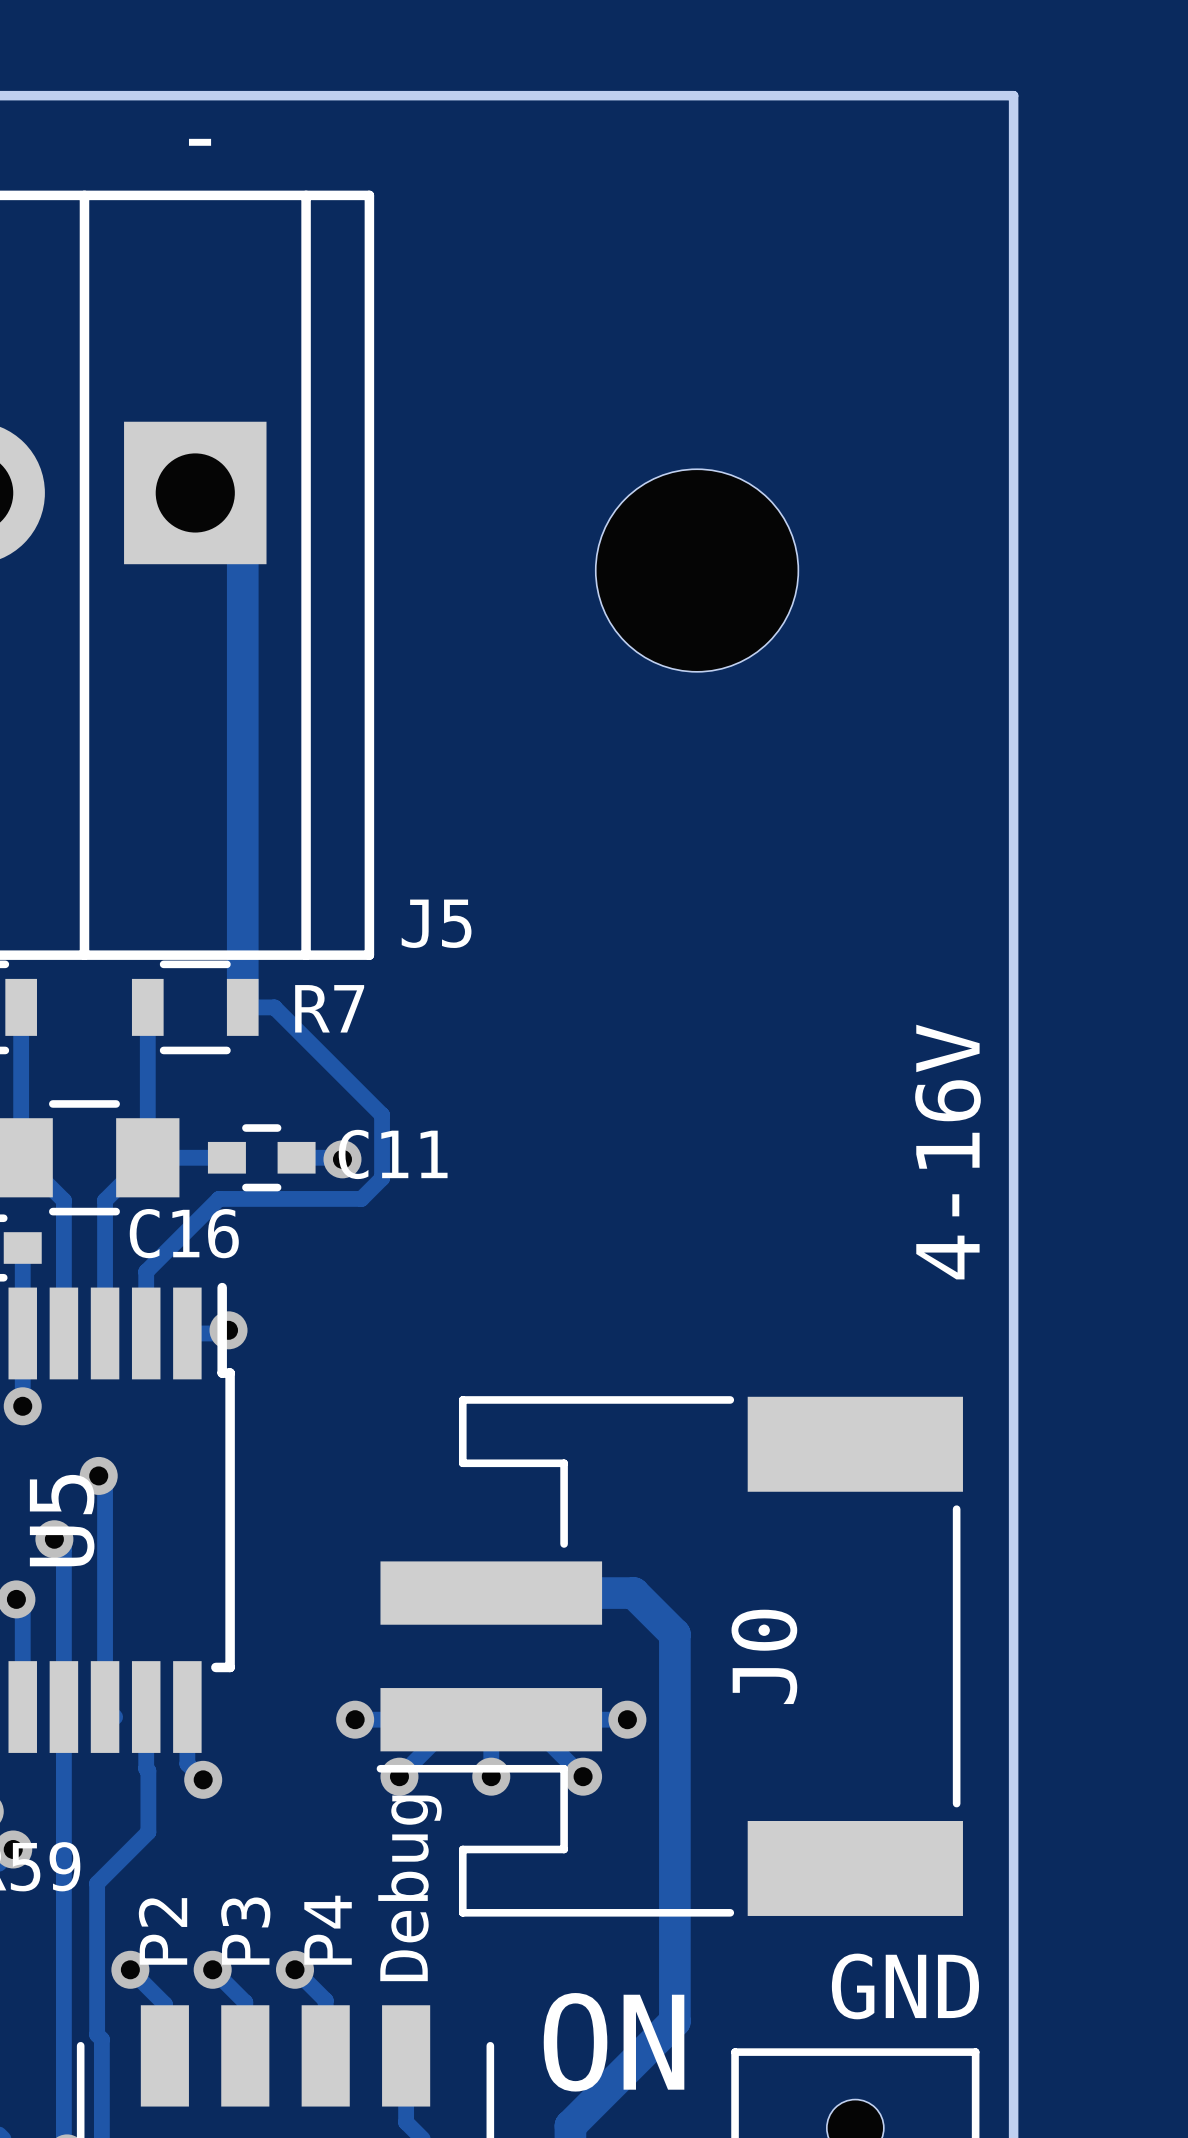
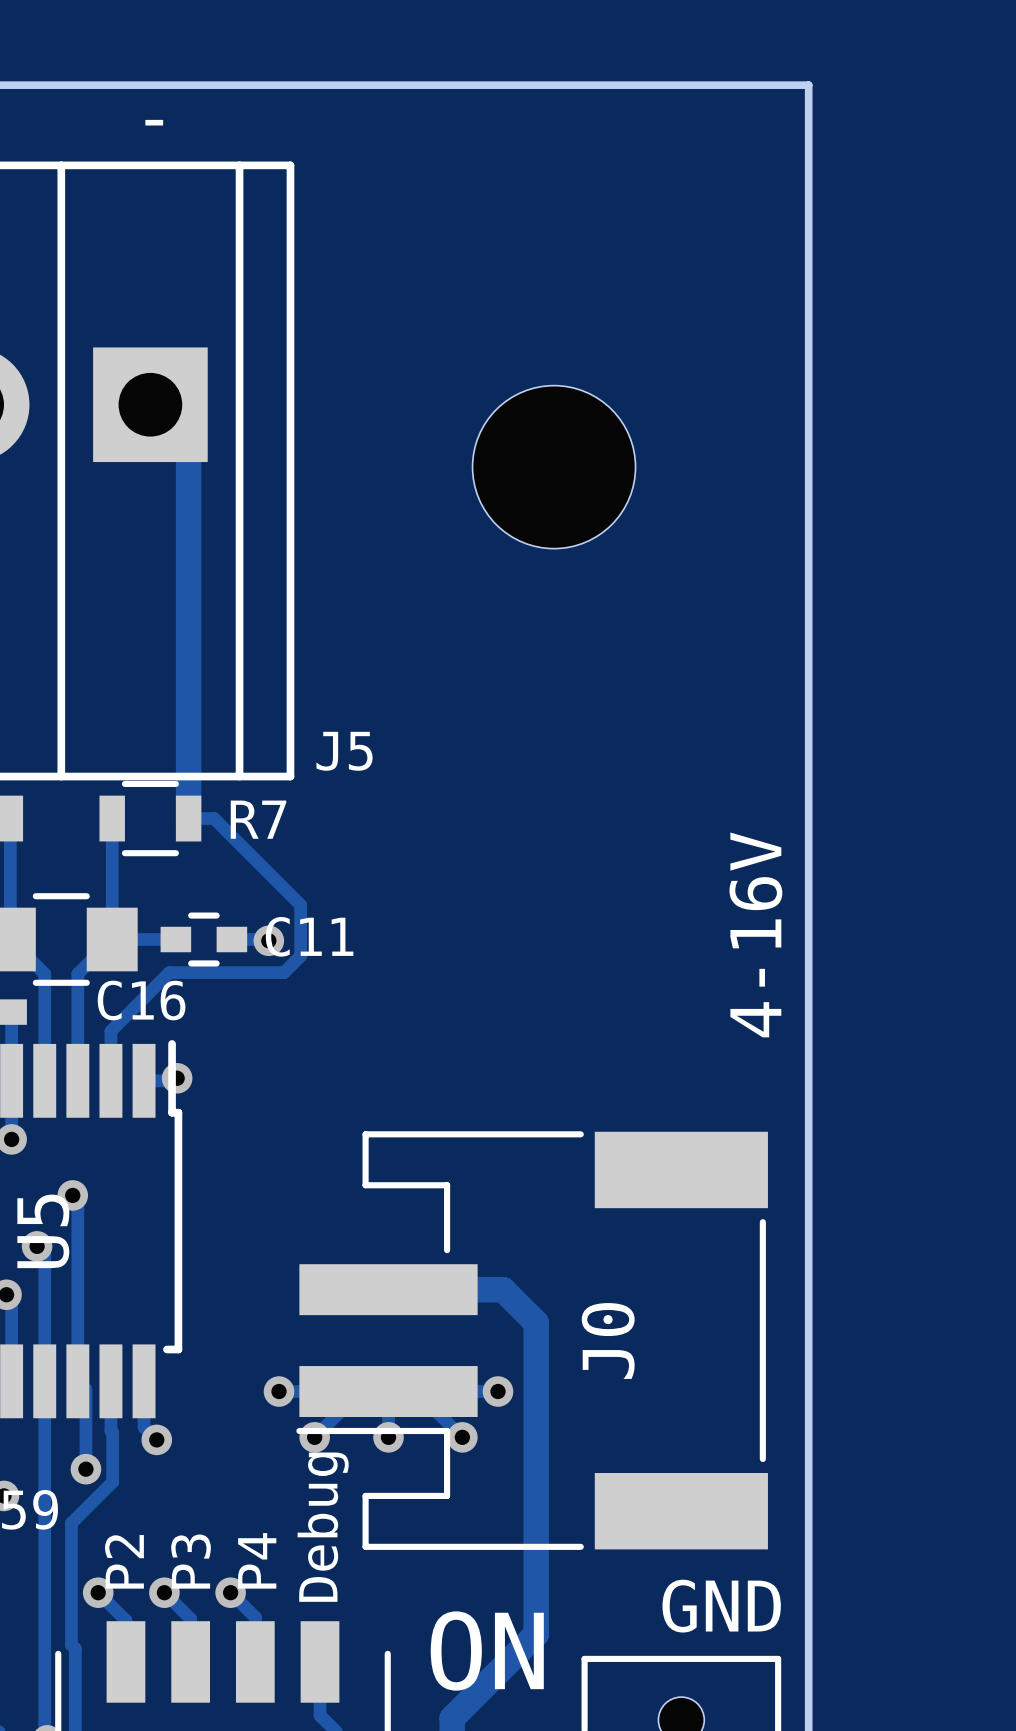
track: none -> (85, 1389) (85, 1469)
via: none -> (85, 1469)

